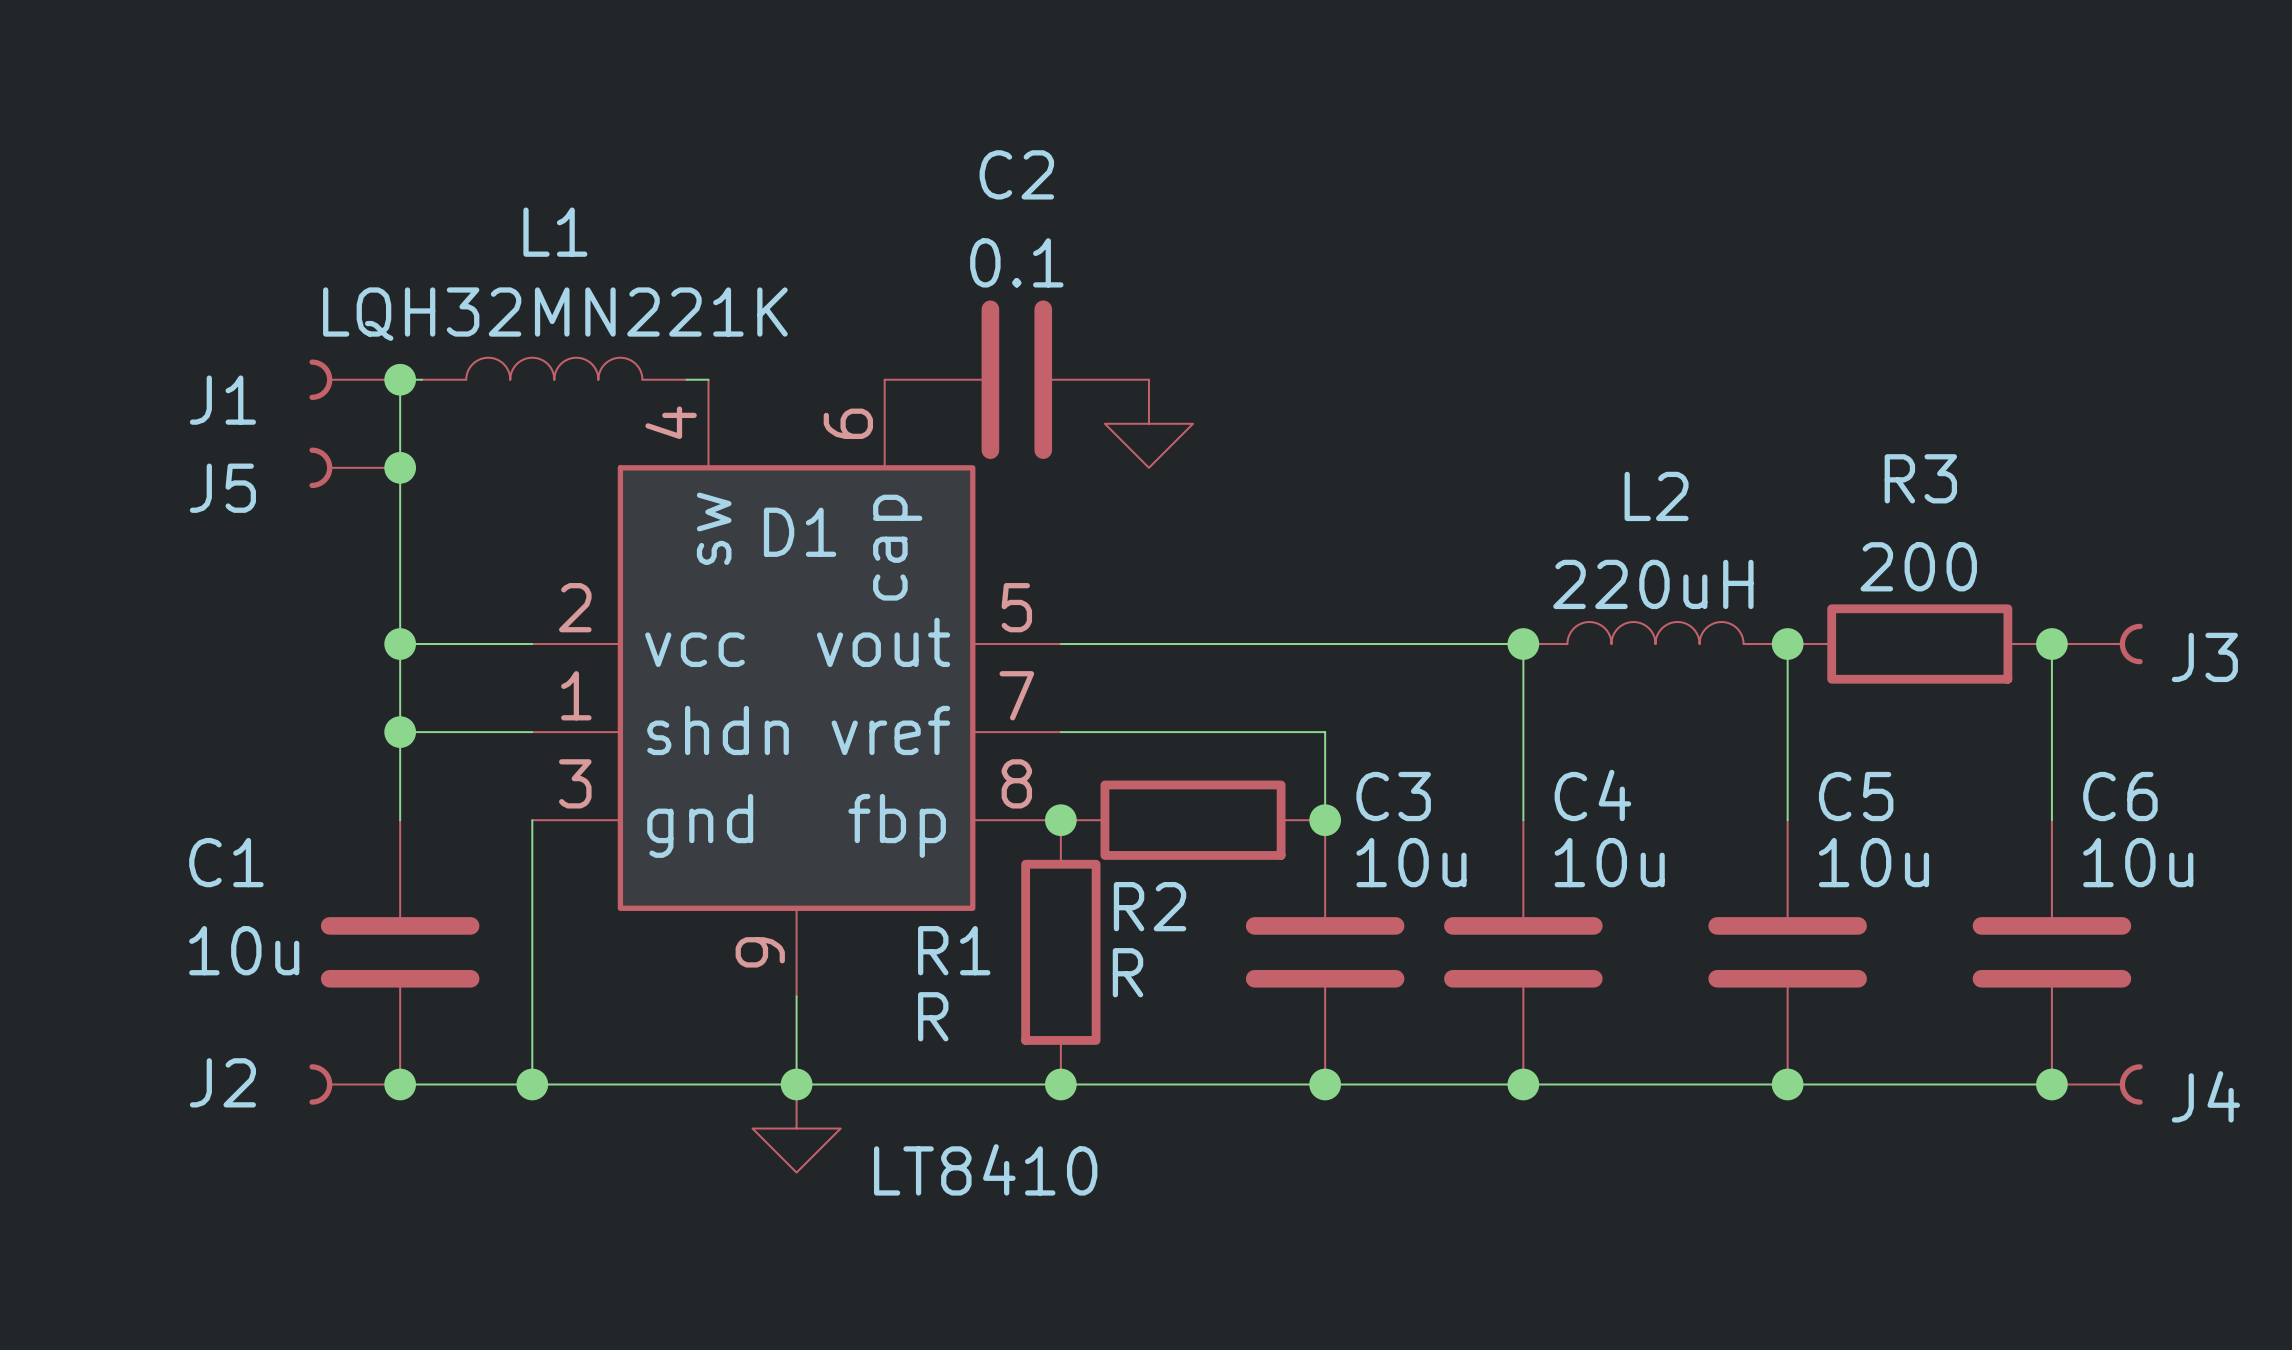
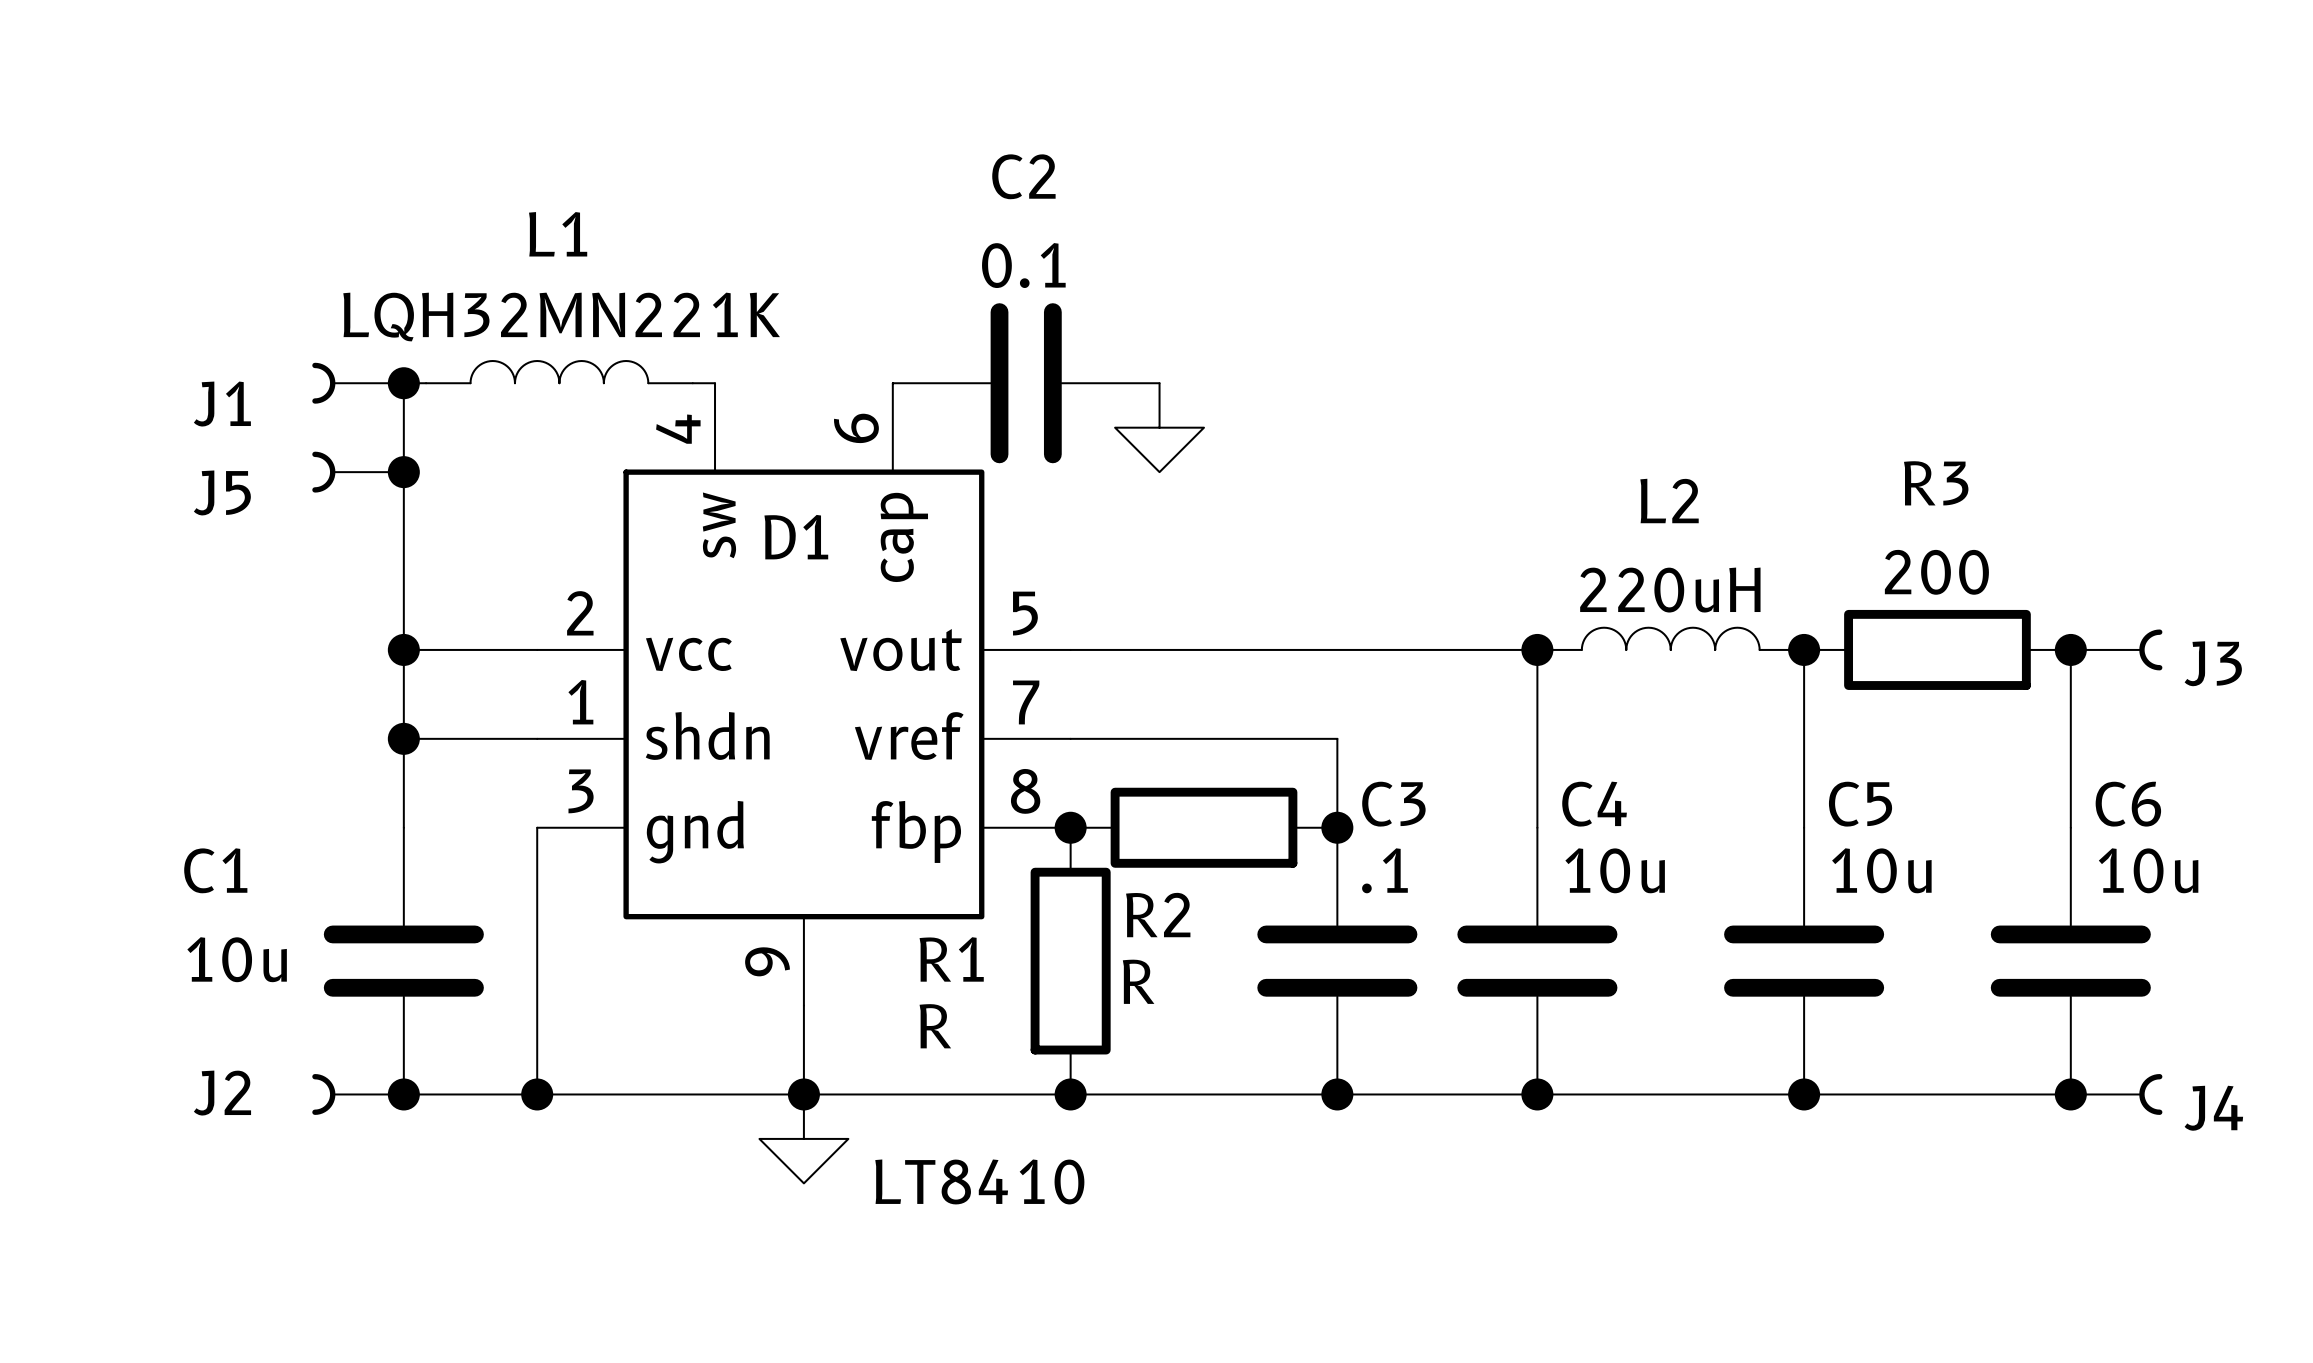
C3 value: 10u (1411, 862) -> .1 (1384, 870)

